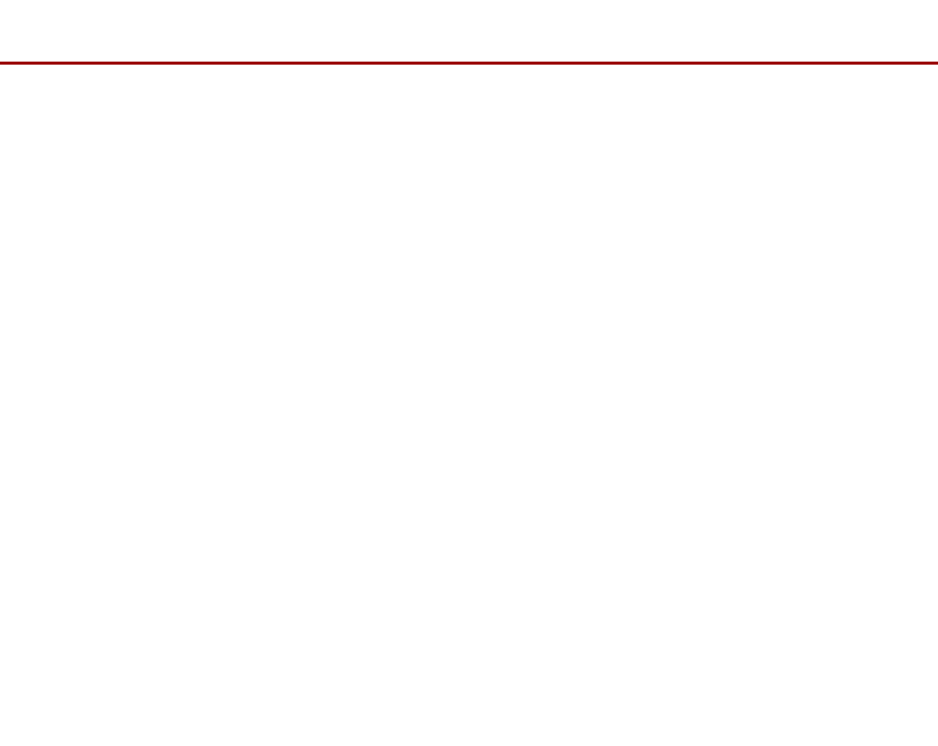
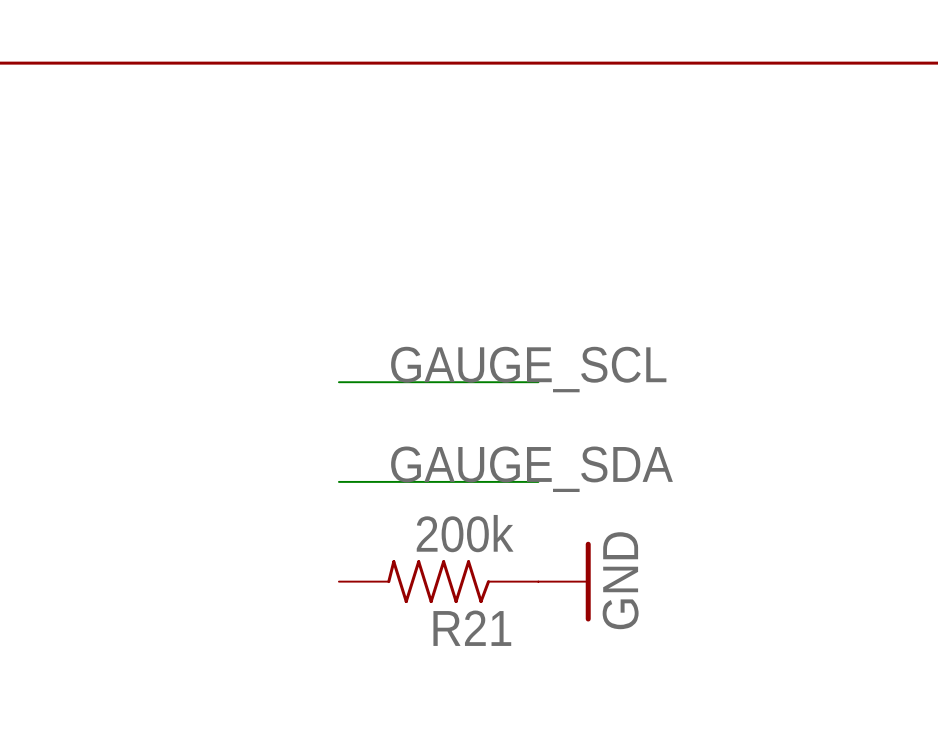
label: none -> GAUGE_SCL (528, 369)
wire: none -> (338, 382) (538, 382)
label: none -> GAUGE_SDA (531, 469)
wire: none -> (338, 481) (538, 481)
R21: none -> 200k (438, 581)
power symbol: none -> GND (564, 581)

